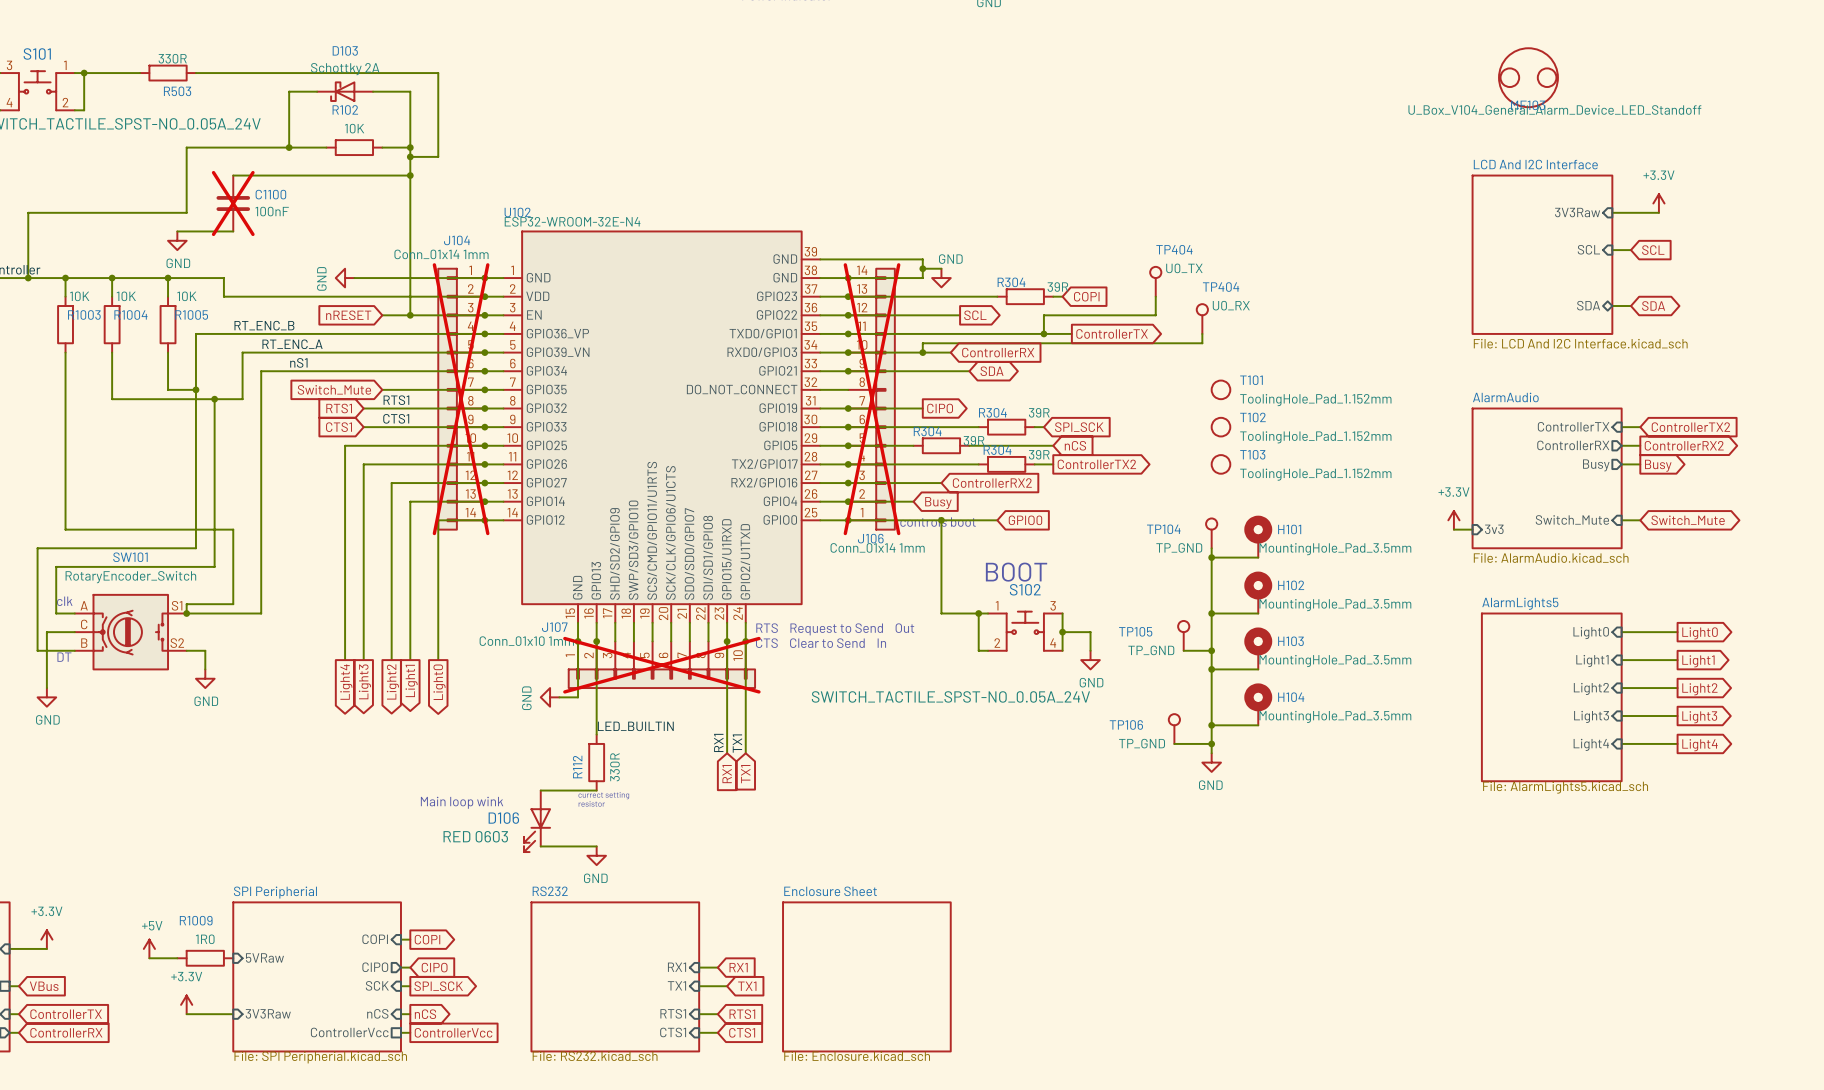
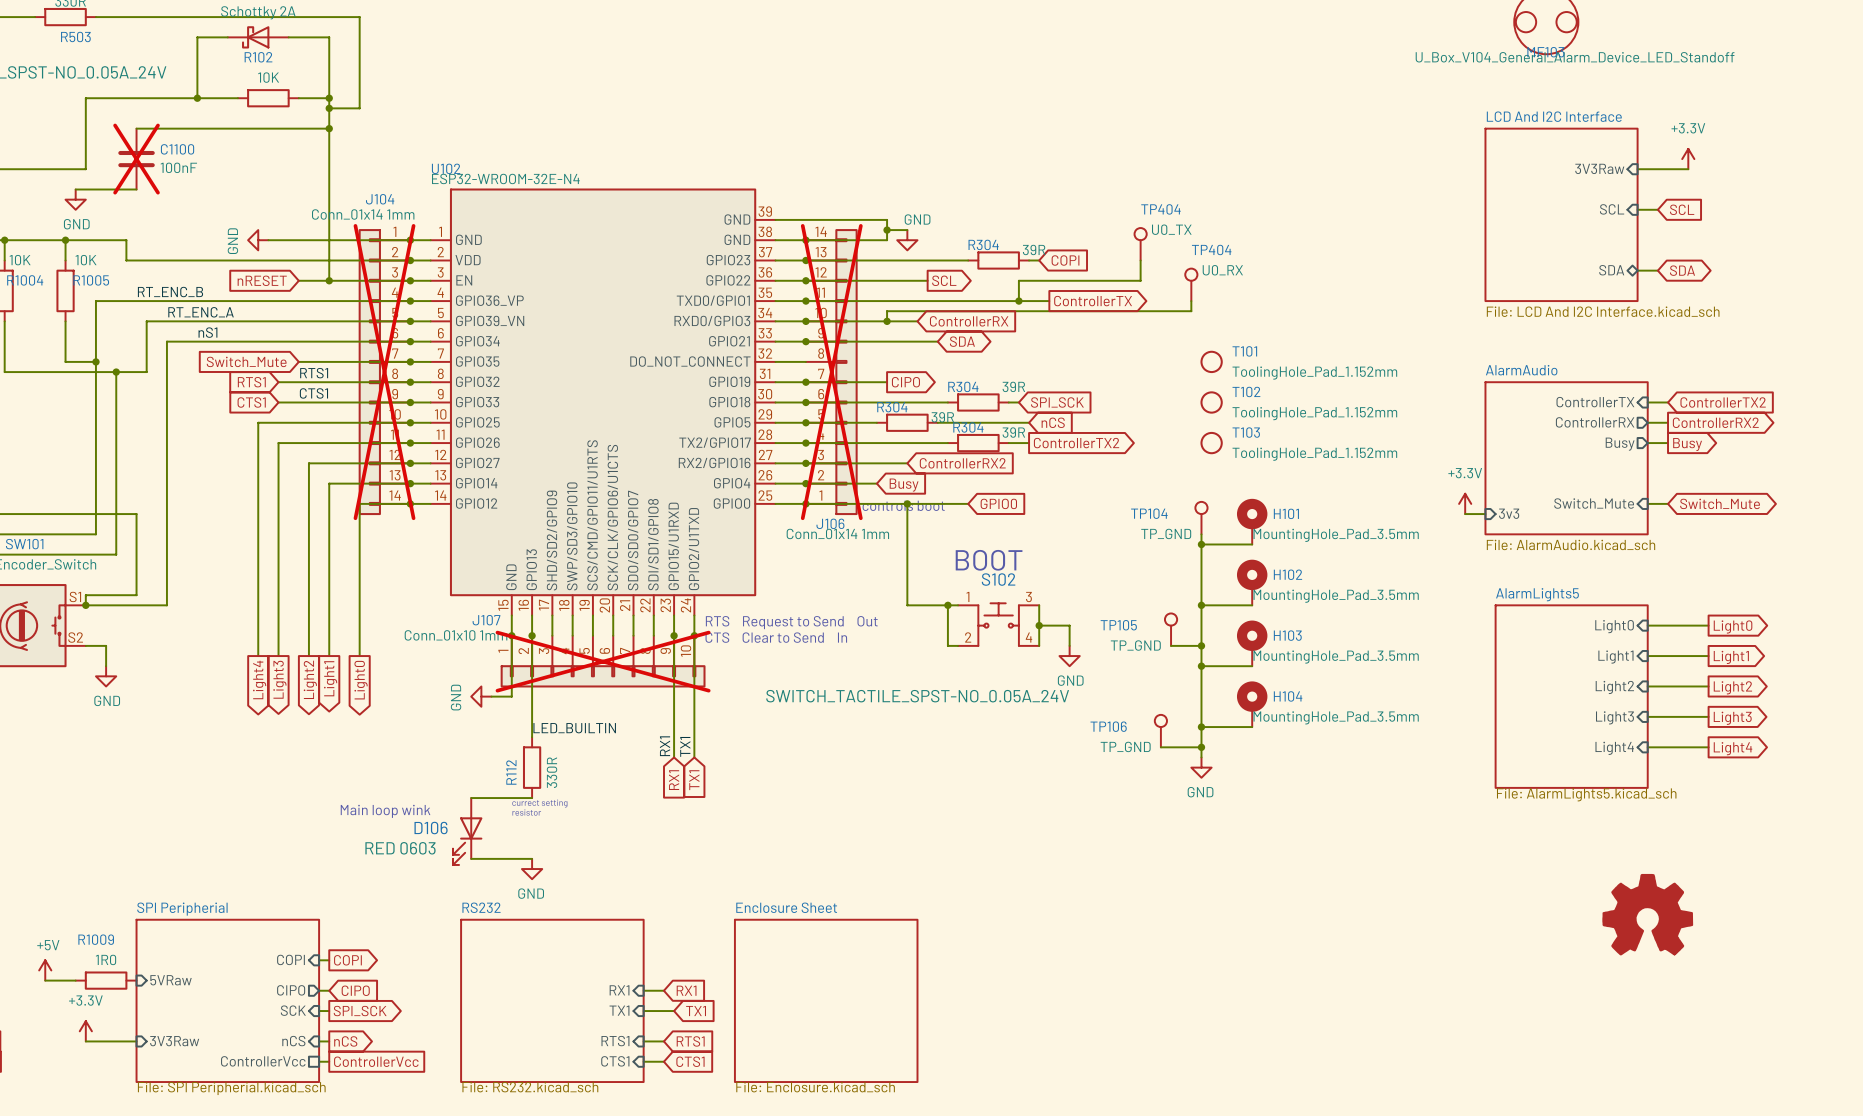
power symbol: none -> (1647, 914)

